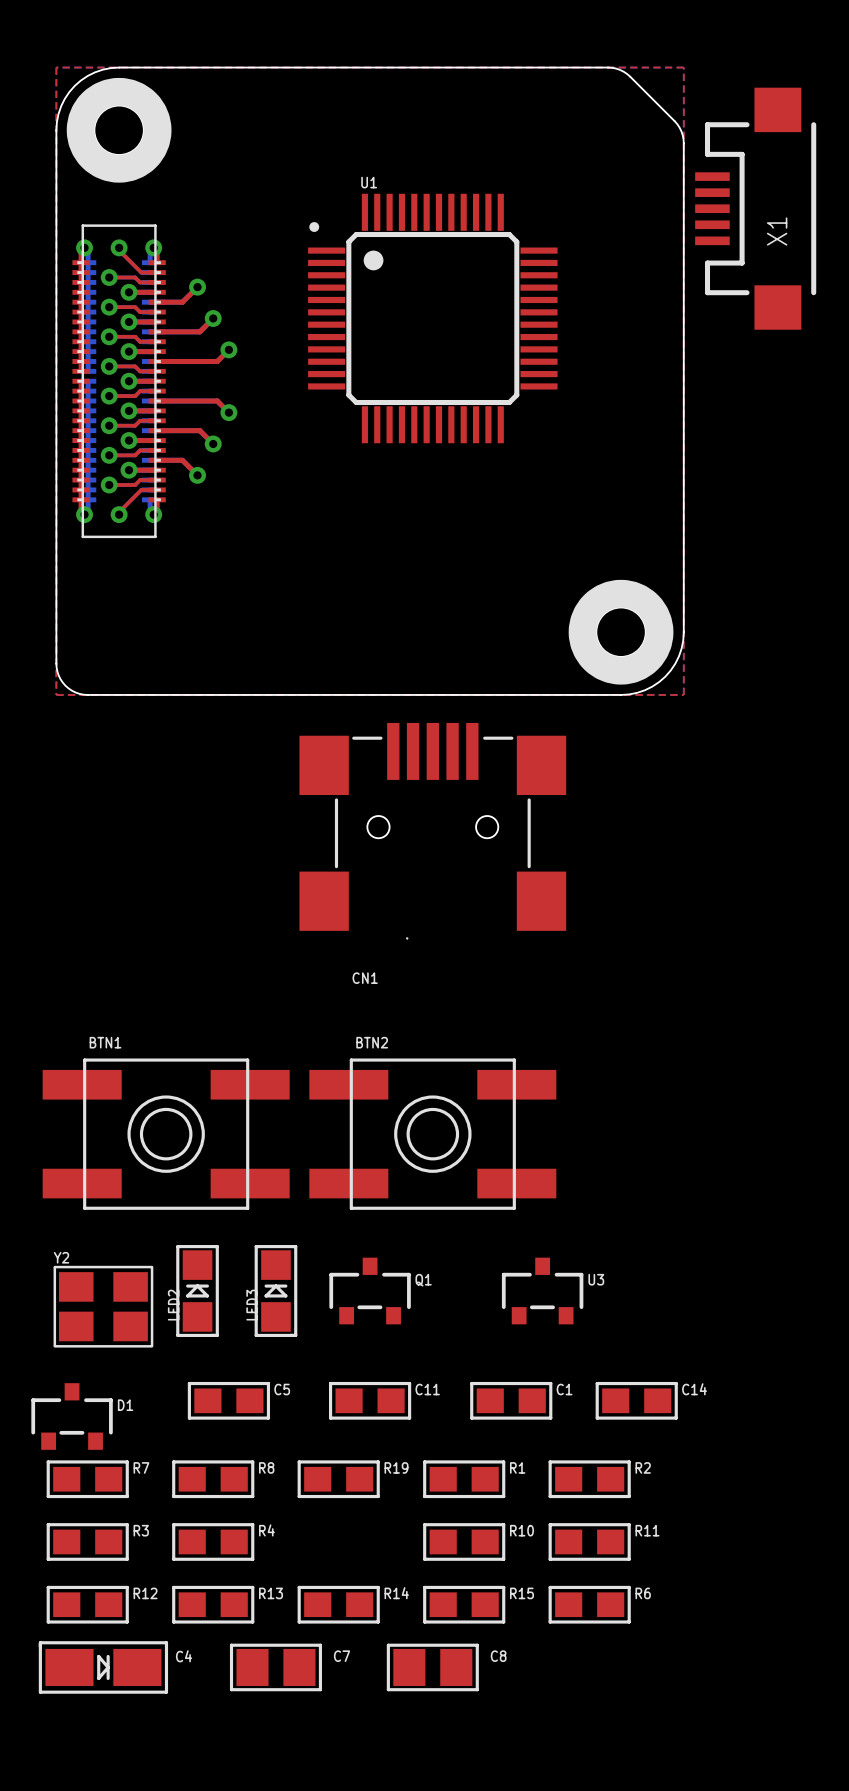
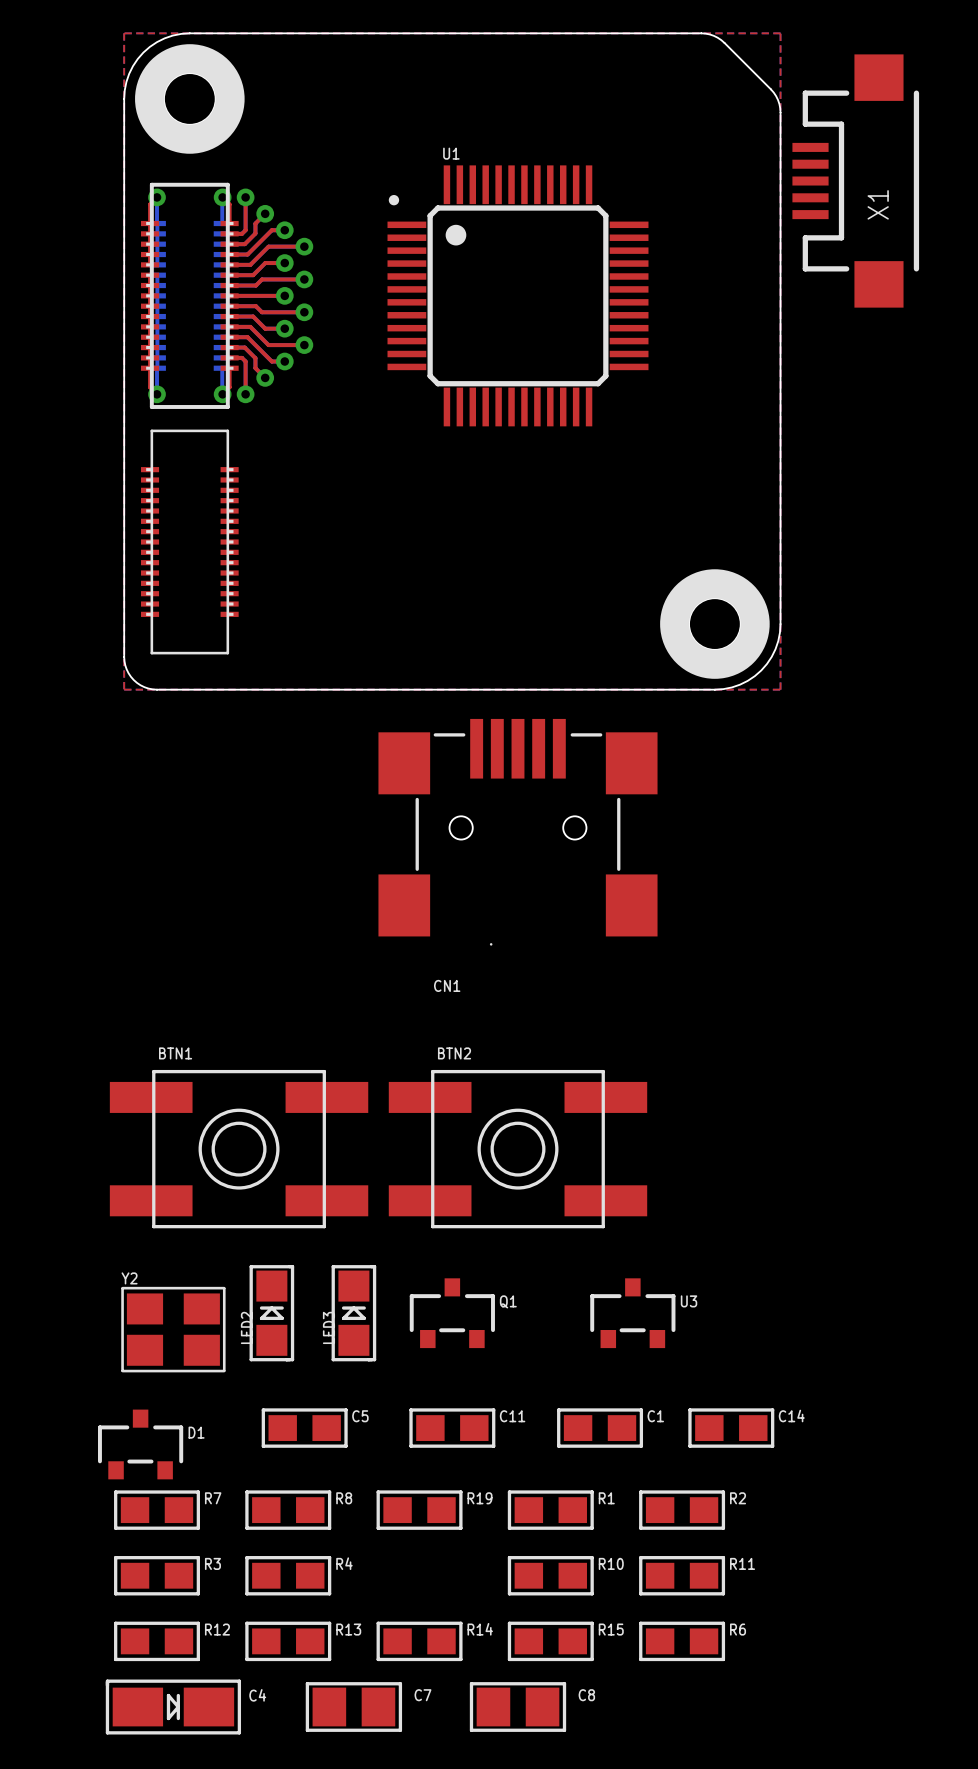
part: none -> (227, 295)
part: (154, 381) -> none
part: none -> (189, 542)

